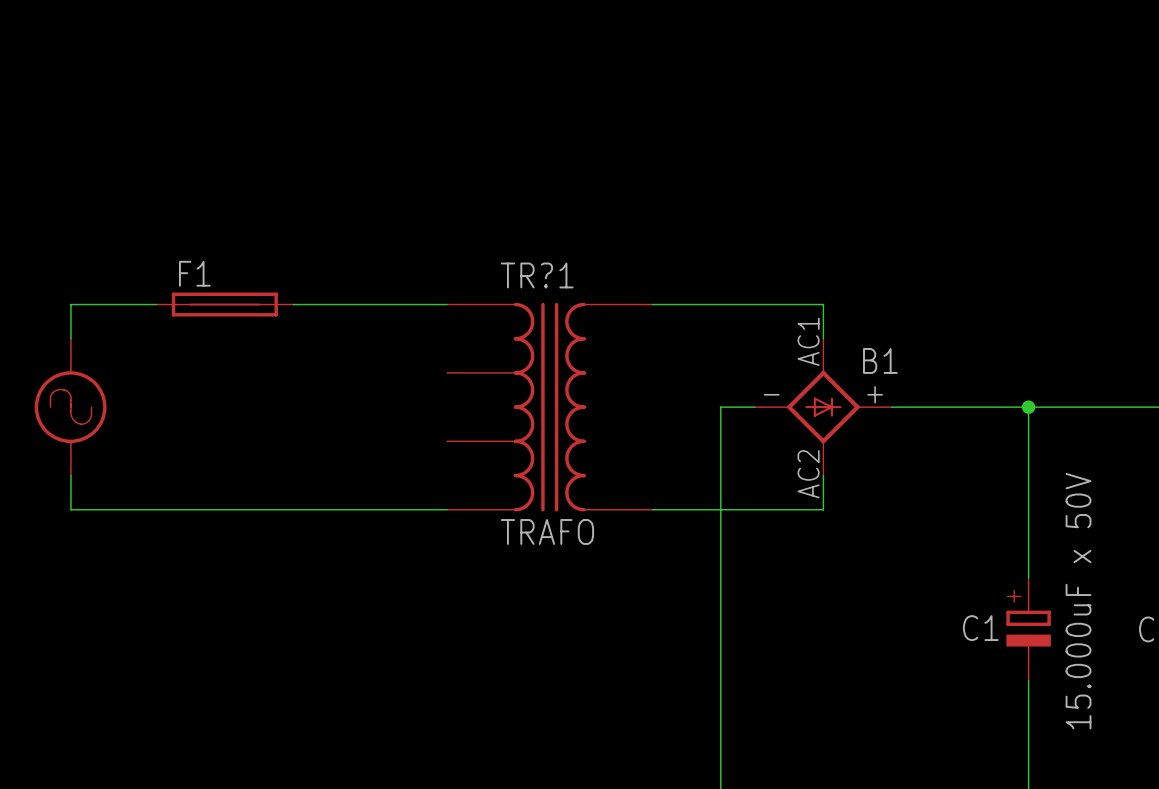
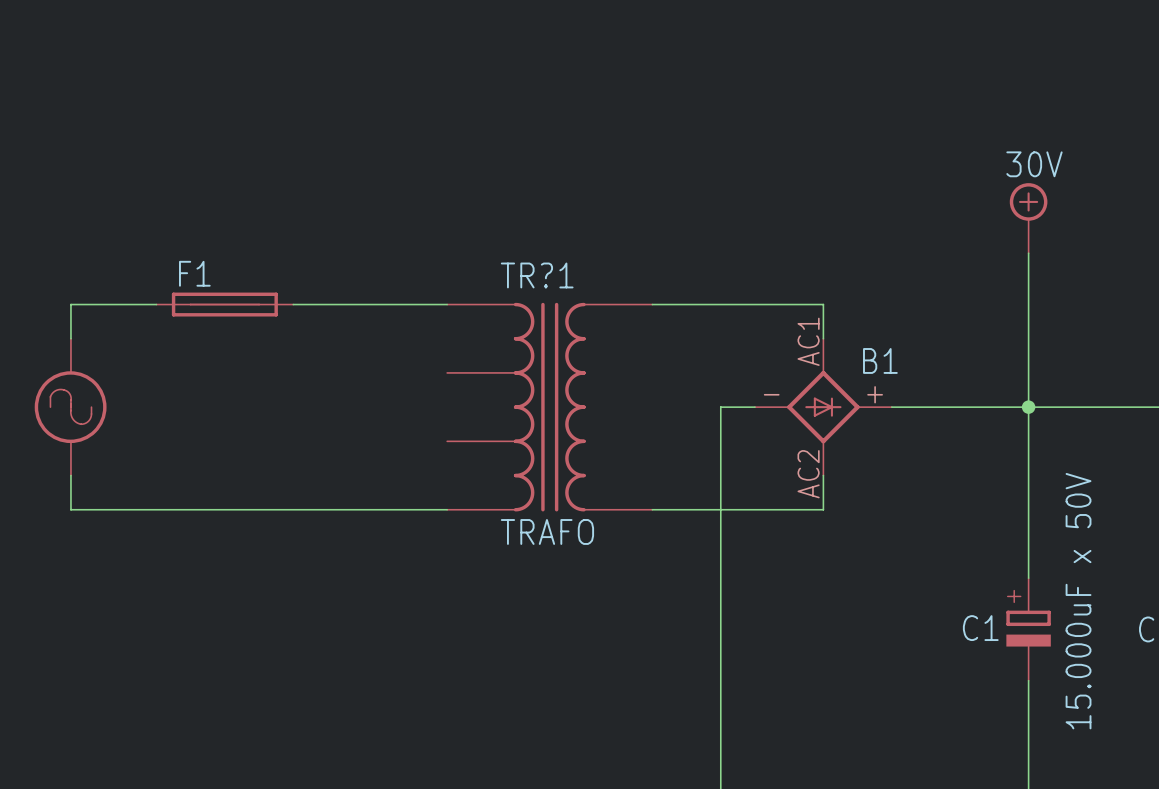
power symbol: none -> 30V (1028, 218)
wire: none -> (1028, 253) (1028, 407)

